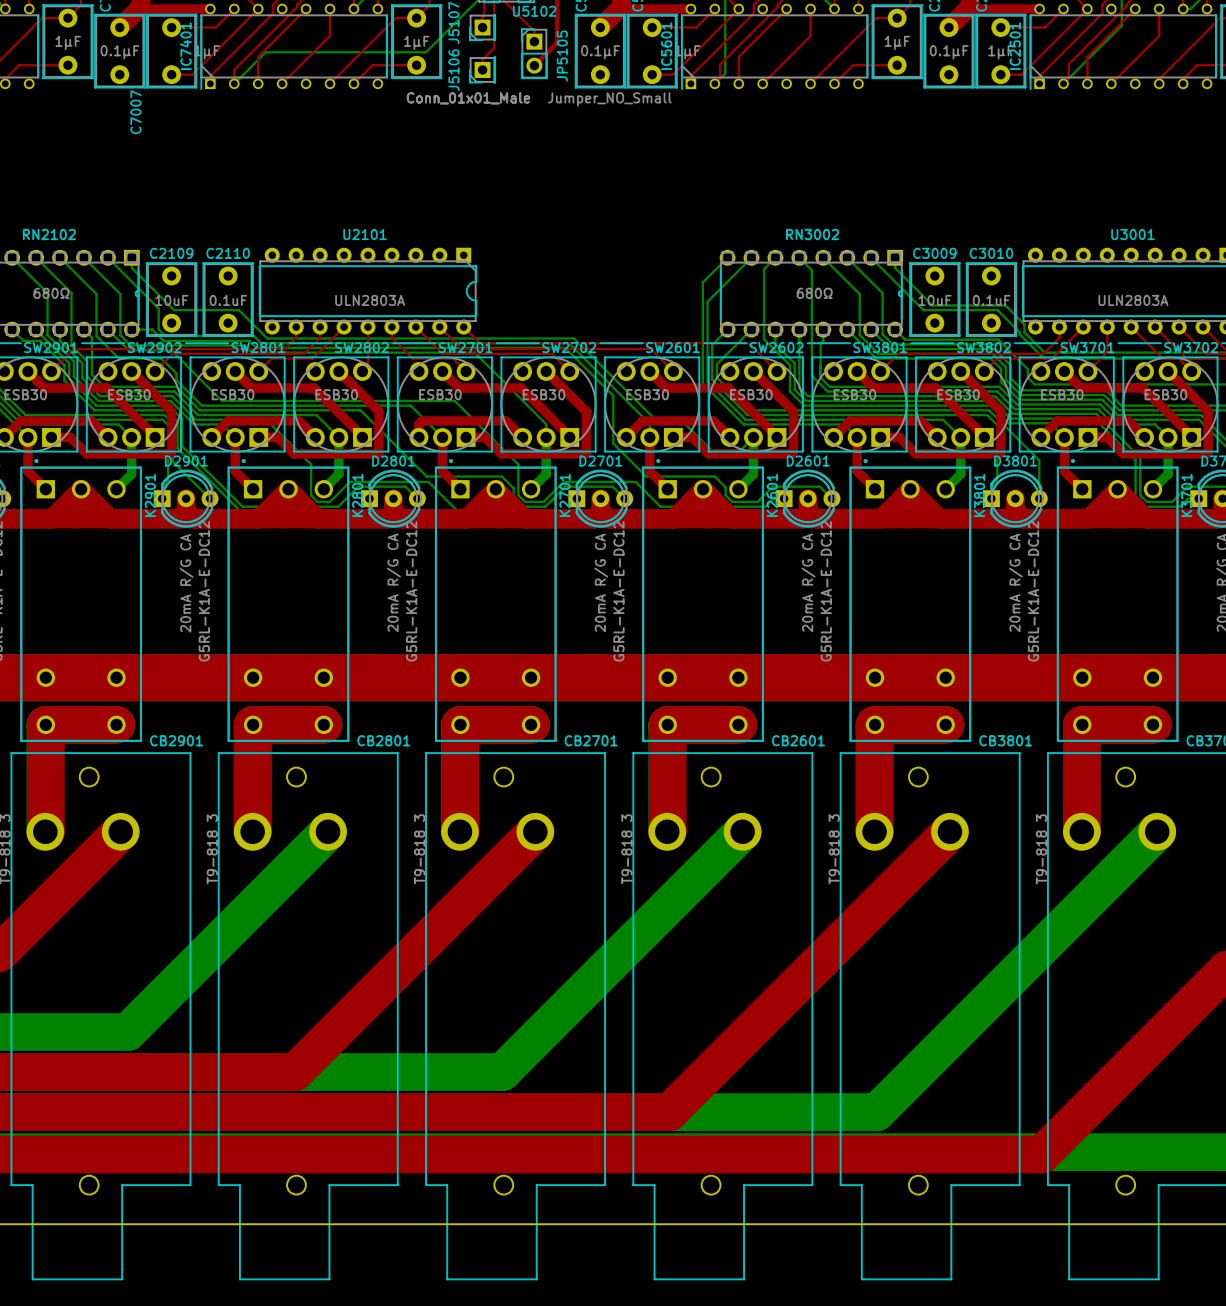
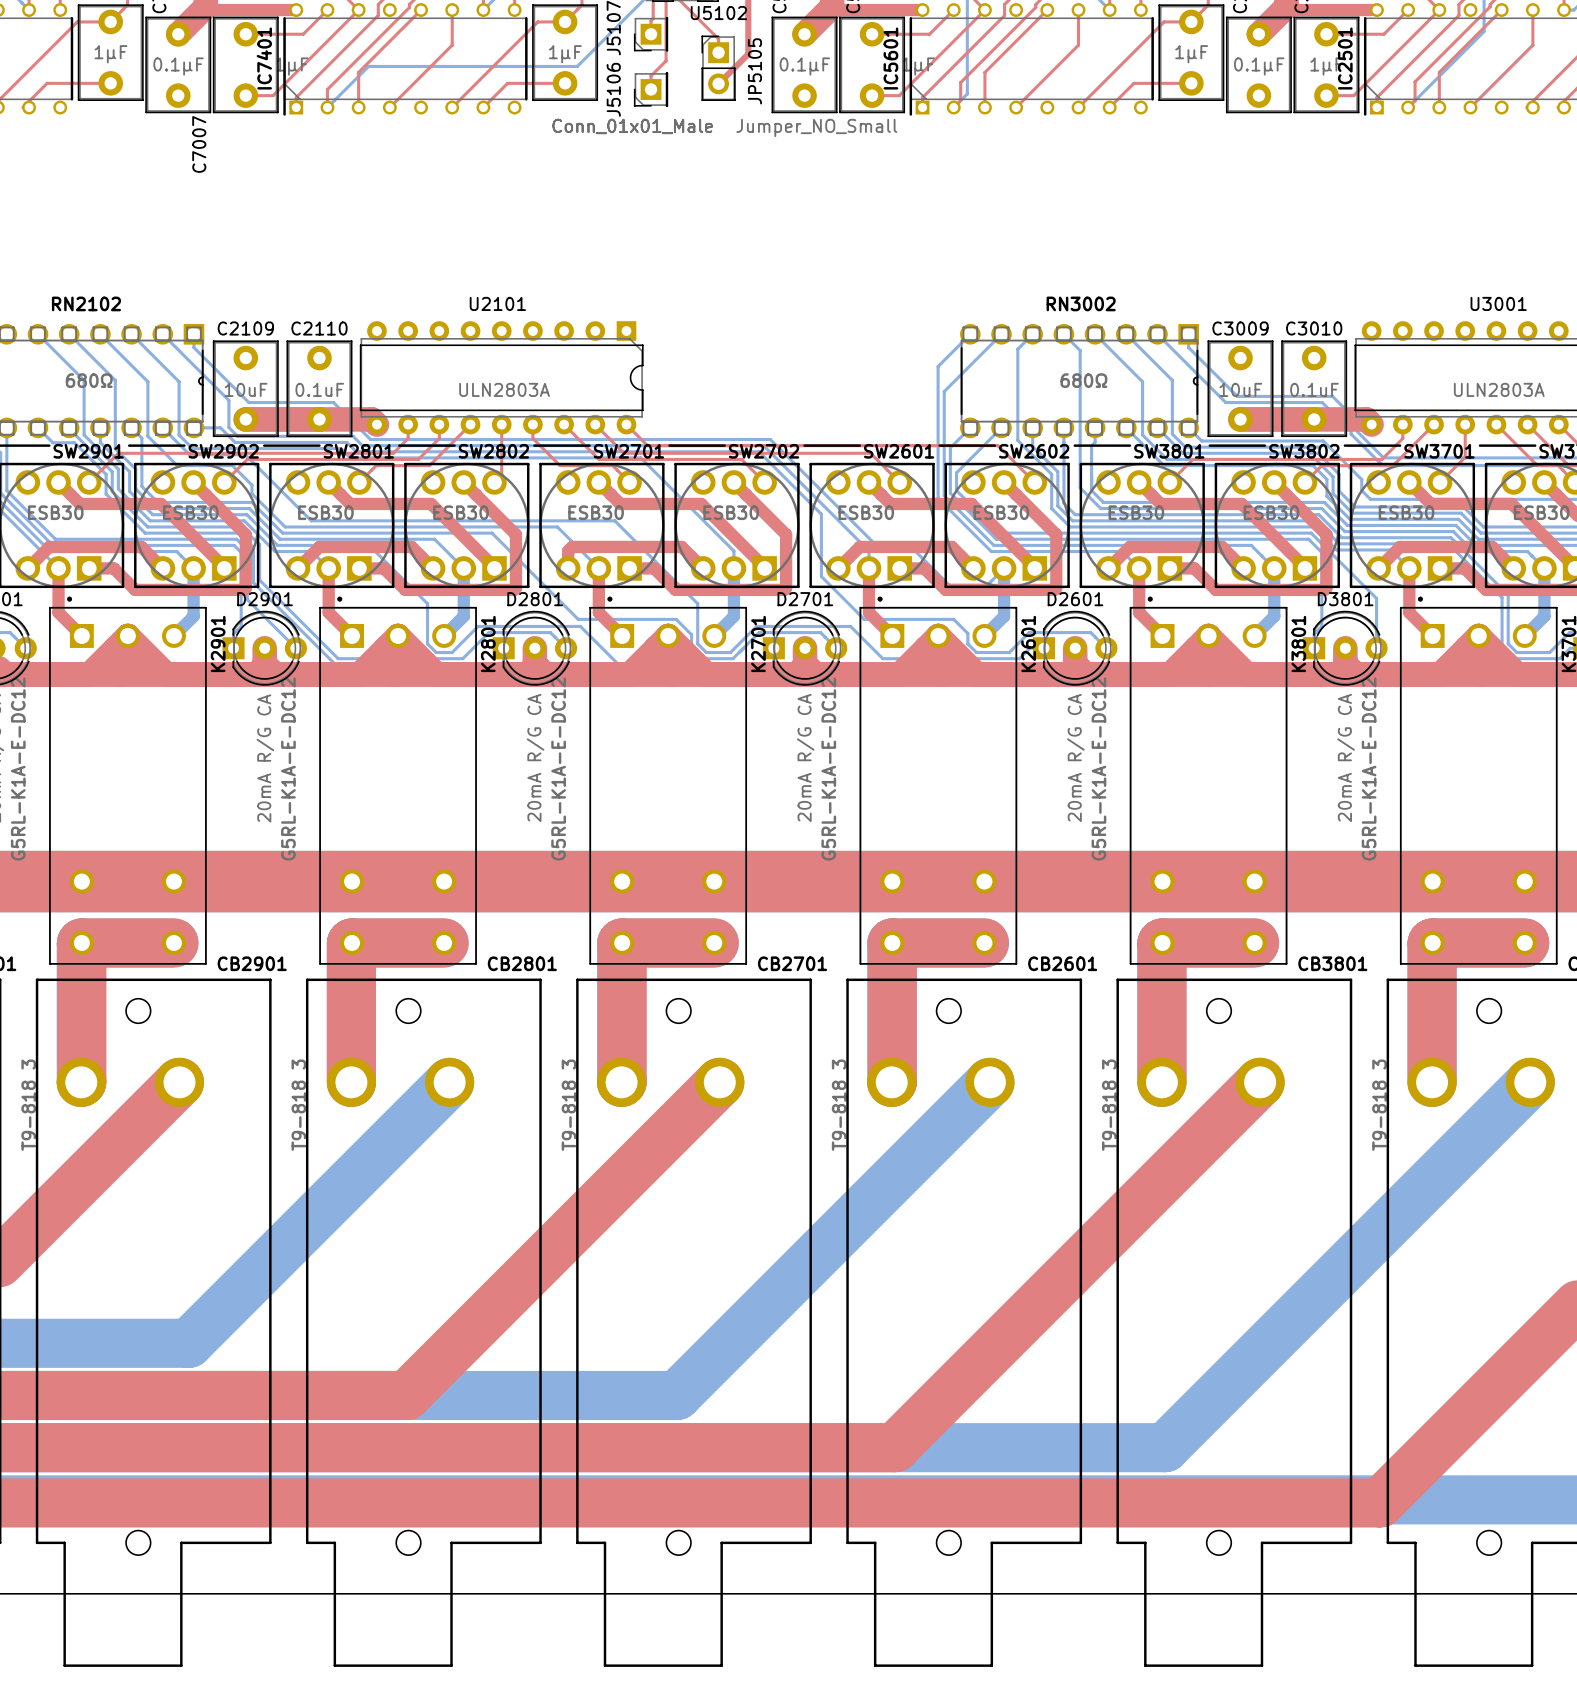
top track: none -> (245, 419) (371, 419) (376, 424)
top track: none -> (1240, 419) (1366, 419) (1371, 424)

